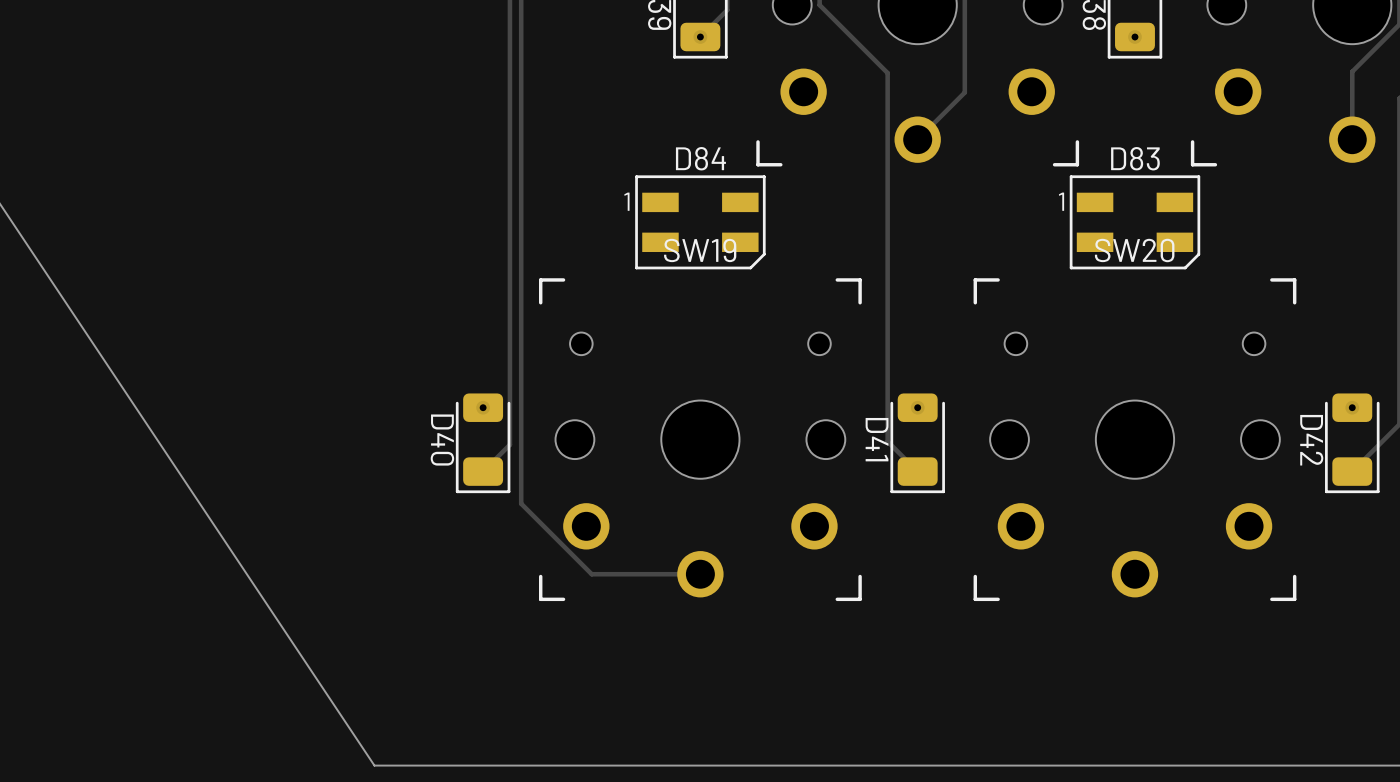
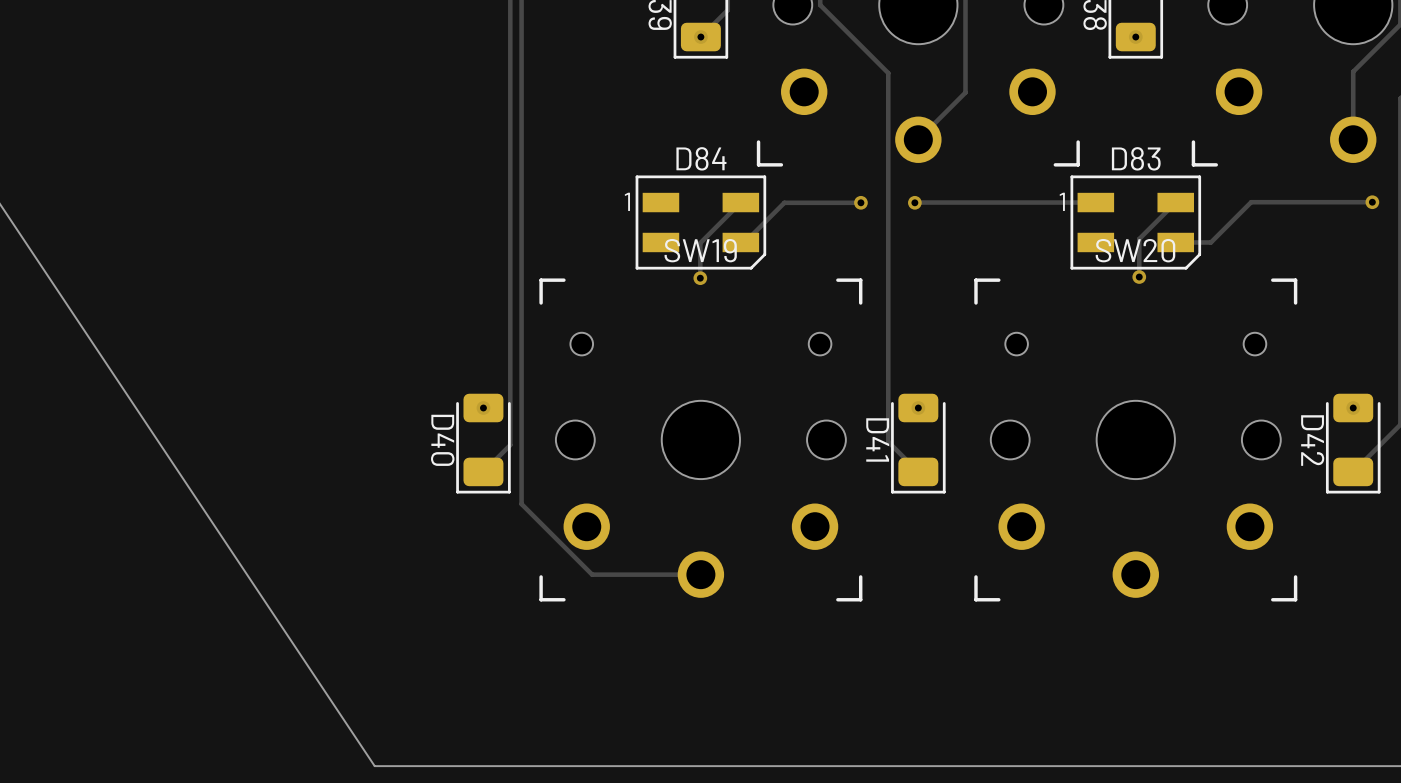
track: none -> (740, 202) (700, 243) (700, 278)
track: none -> (860, 202) (784, 202) (744, 242) (740, 242)
via: none -> (860, 202)
via: none -> (914, 202)
track: none -> (1095, 202) (915, 202)
track: none -> (1175, 202) (1139, 239) (1139, 277)
track: none -> (1372, 202) (1251, 202) (1210, 242) (1175, 242)
via: none -> (1372, 202)
via: none -> (1139, 277)
via: none -> (700, 278)

